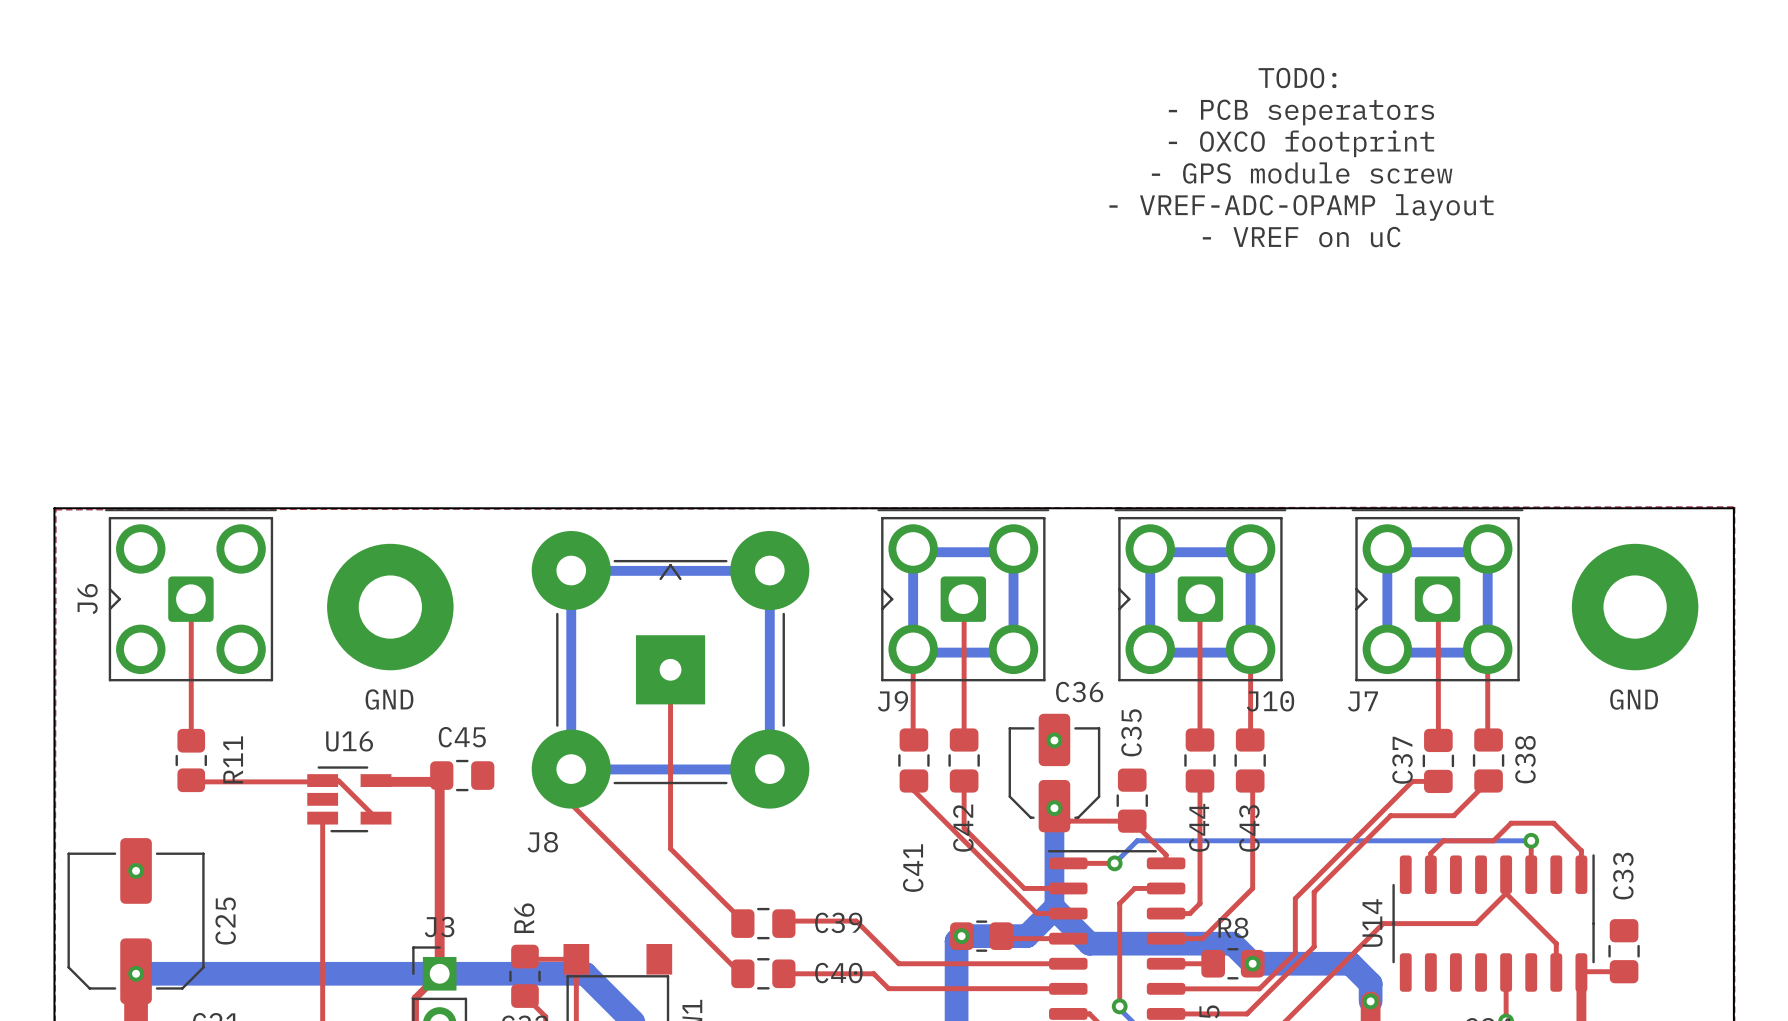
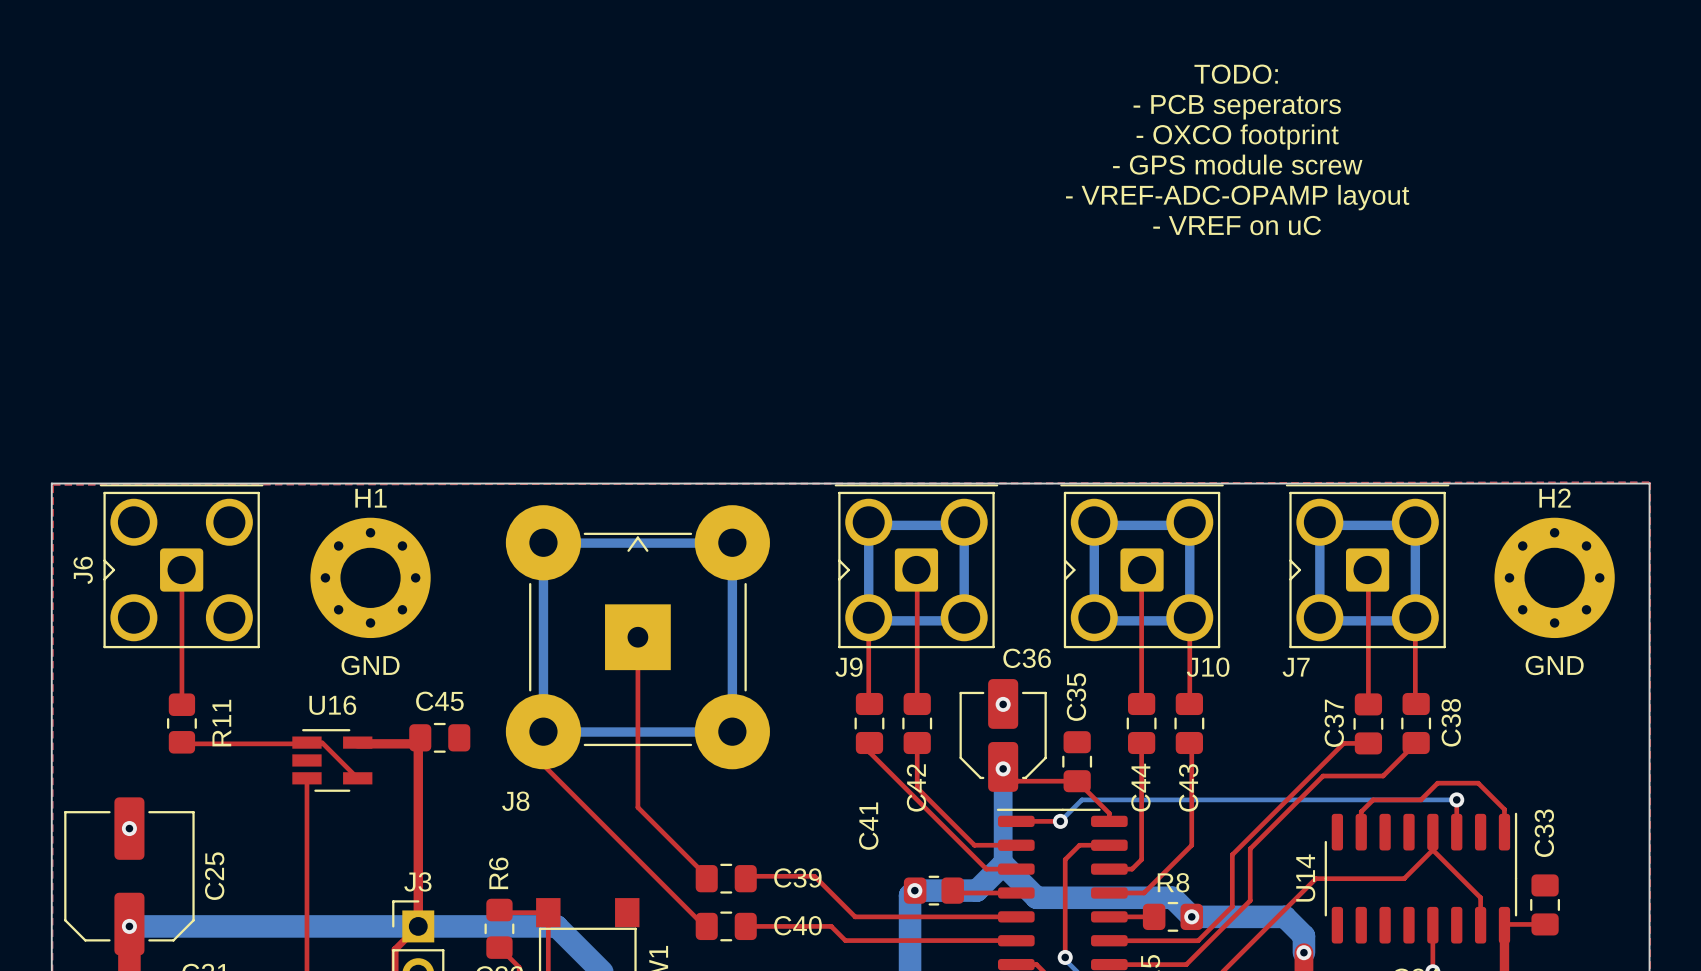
H1: none -> (370, 577)
part: (390, 607) -> none
H2: none -> (1554, 577)
part: (1635, 607) -> none

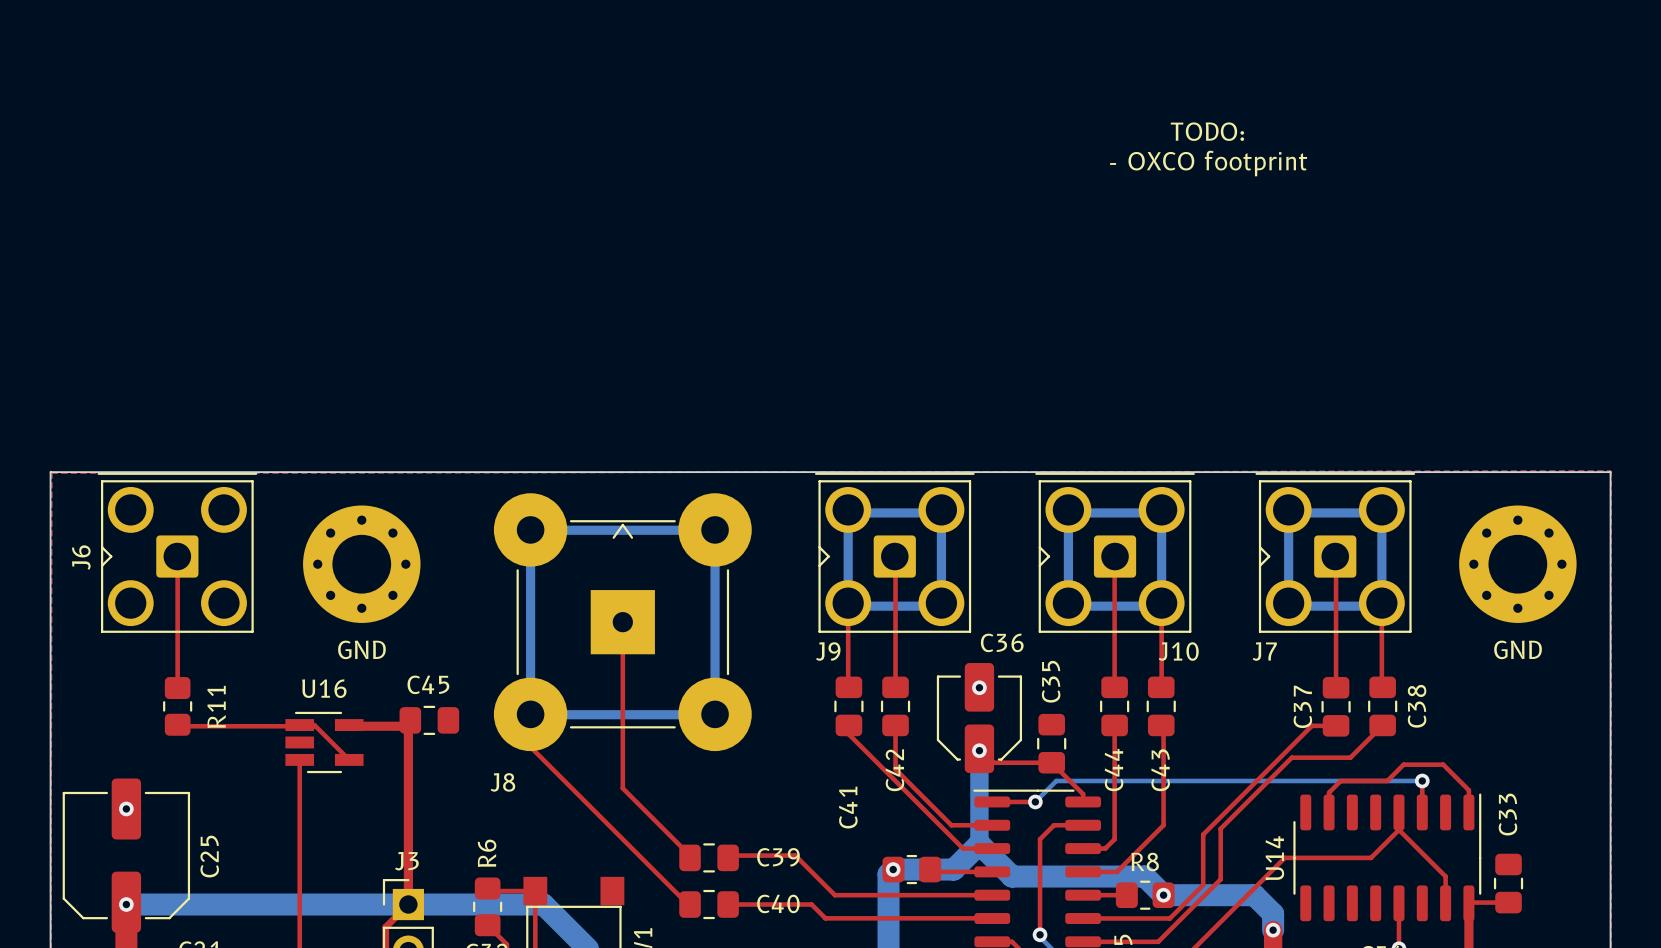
text: TODO: (1236, 74) -> none
text: - PCB seperators (1237, 107) -> none
text: - OXCO footprint (1237, 137) -> TODO: (1207, 131)
text: - GPS module screw (1237, 164) -> - OXCO footprint (1208, 163)
text: - VREF-ADC-OPAMP layout (1237, 197) -> none
text: - VREF on uC (1237, 225) -> none
H1 name: H1 (370, 498) -> none
H2 name: H2 (1555, 498) -> none

